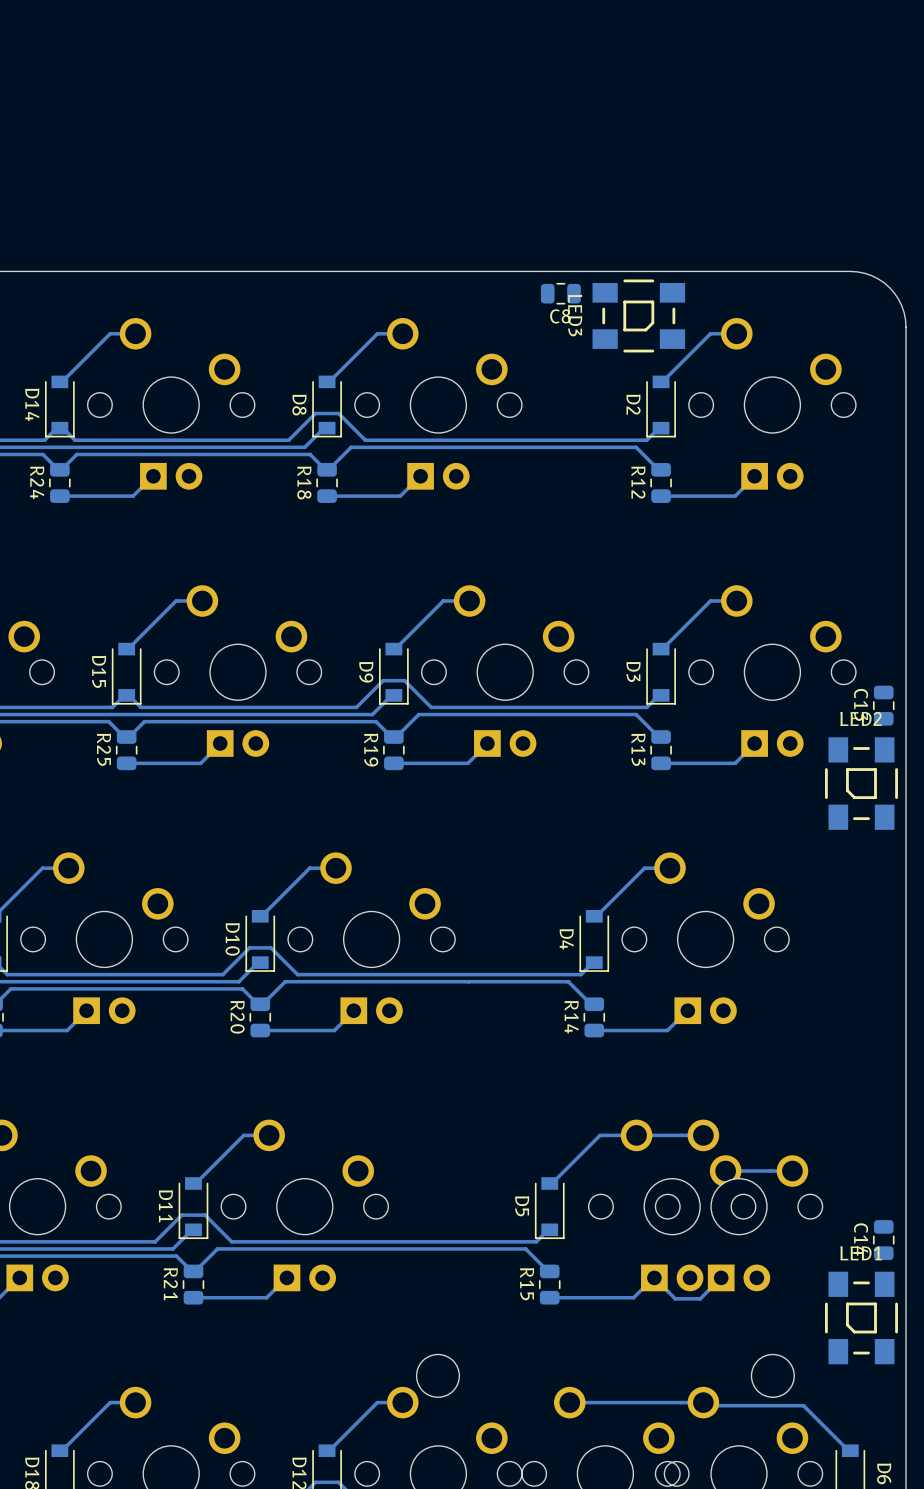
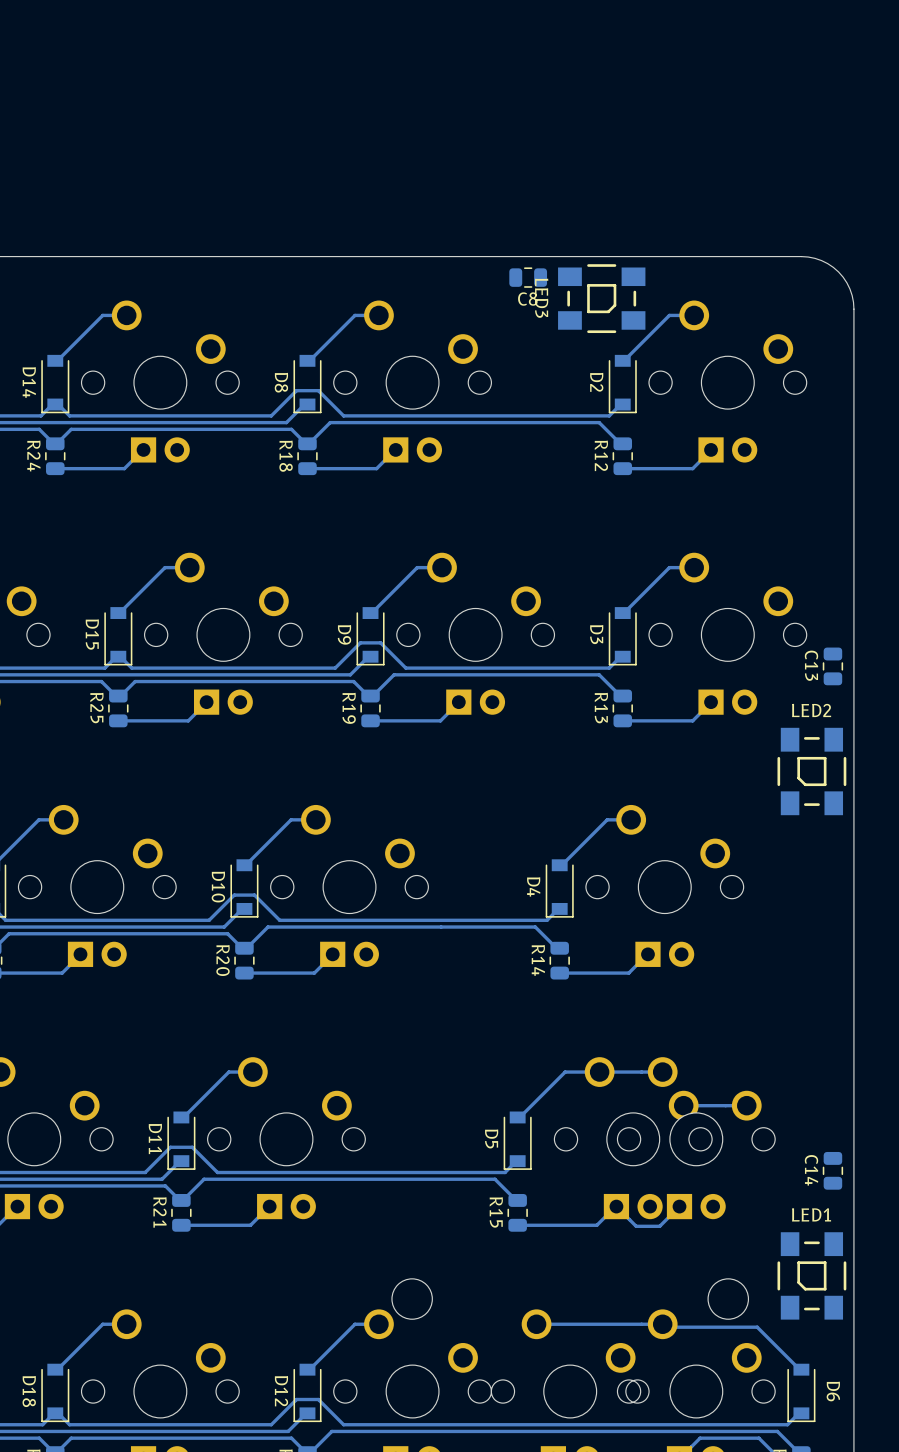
LED2 position: (861, 783) -> (811, 771)
LED1 position: (861, 1317) -> (811, 1275)

